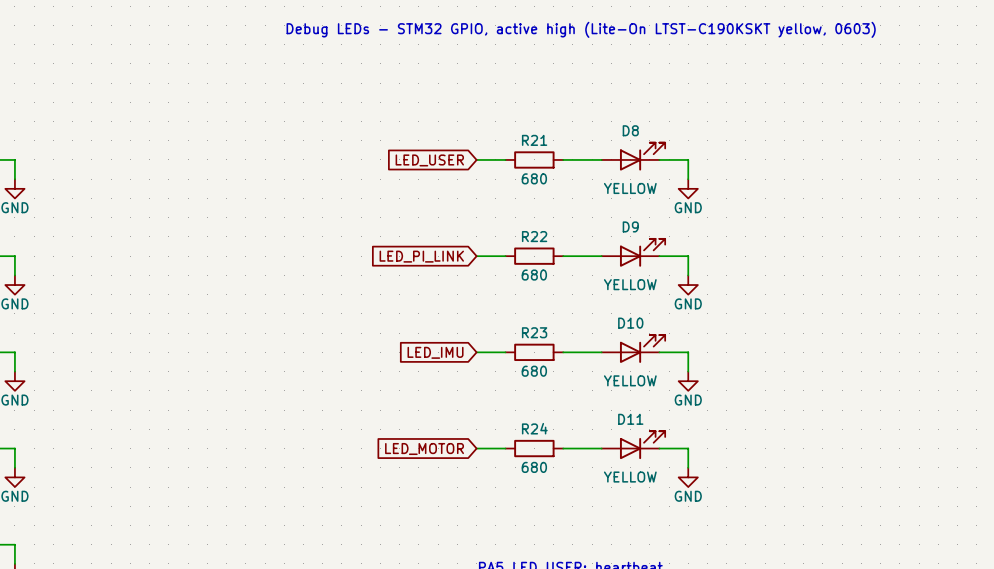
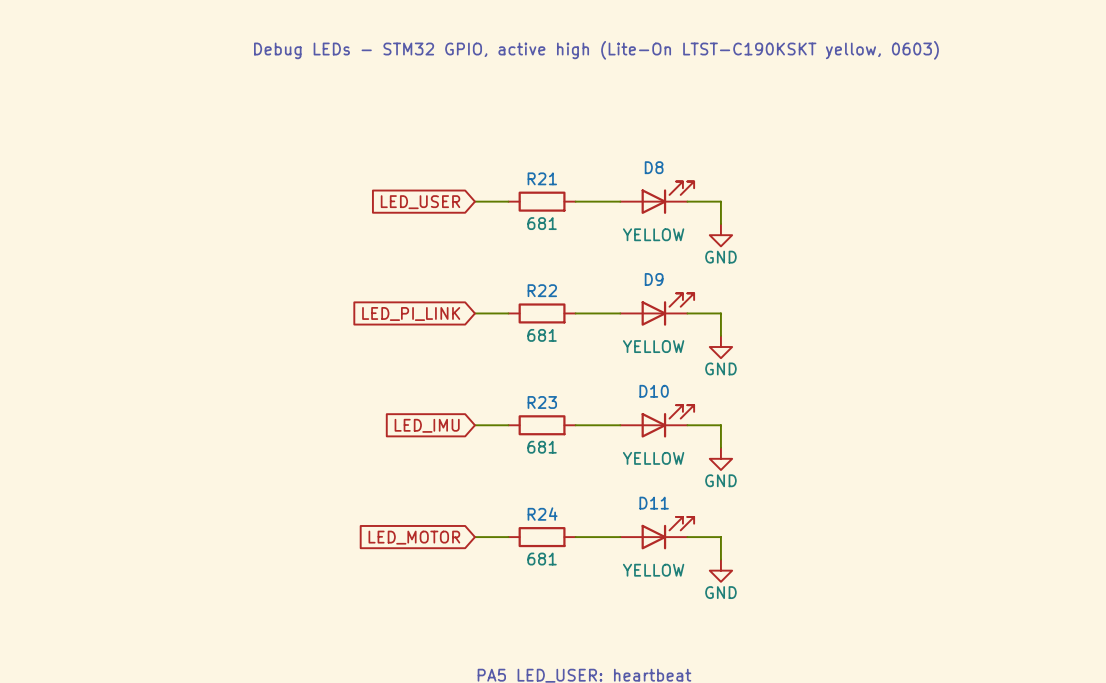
R21 value: 680 (534, 178) -> 681 (542, 223)
R22 value: 680 (534, 275) -> 681 (542, 335)
R23 value: 680 (534, 371) -> 681 (542, 447)
R24 value: 680 (534, 467) -> 681 (542, 559)

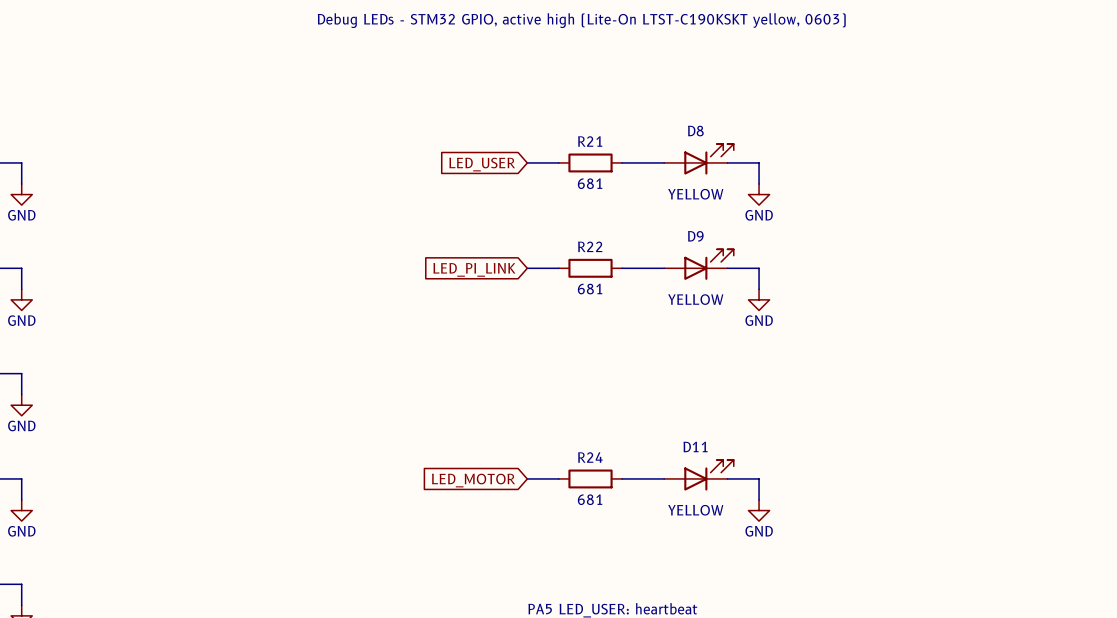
D10: YELLOW (657, 421) -> none
global label: LED_IMU (427, 425) -> none
wire: (474, 425) (508, 425) -> none
R23: 681 (542, 425) -> none
wire: (575, 425) (620, 425) -> none
wire: (687, 425) (720, 425) (720, 447) -> none
power symbol: GND (720, 458) -> none

